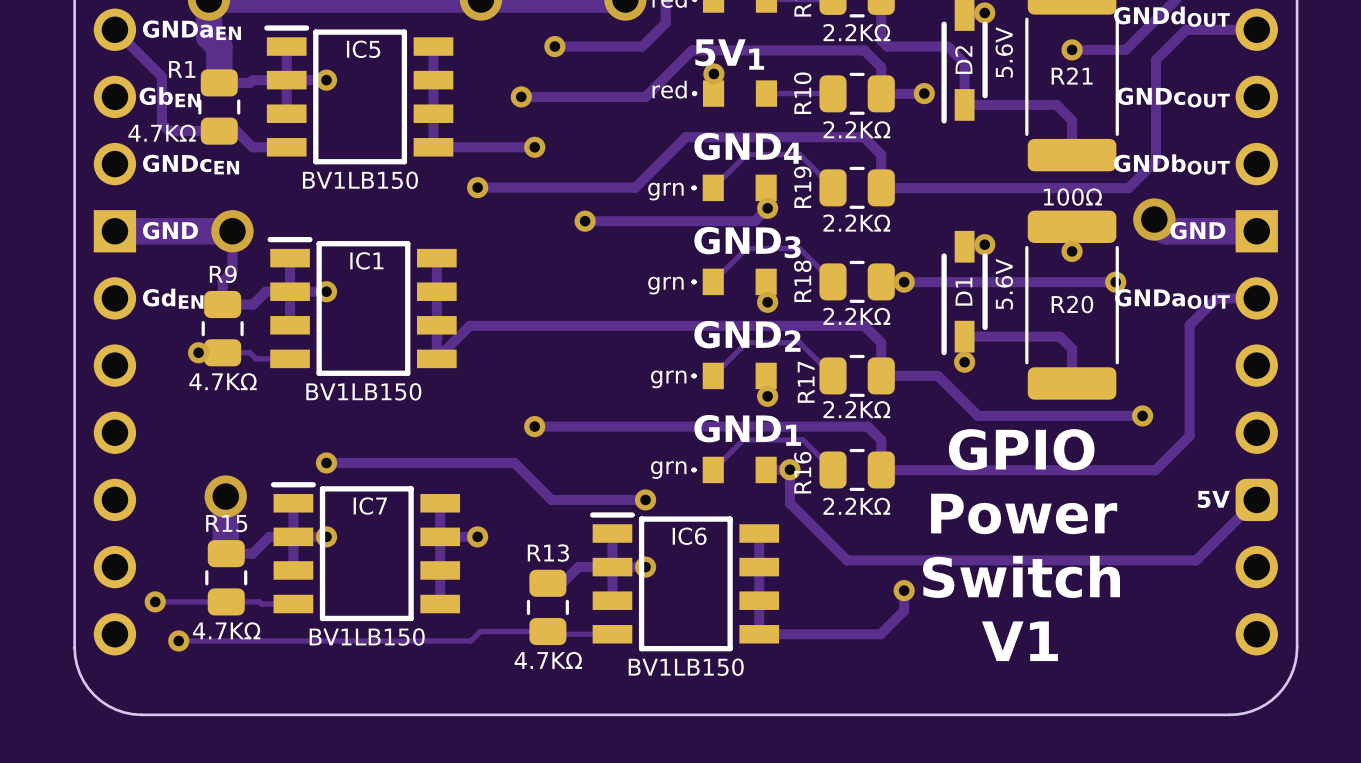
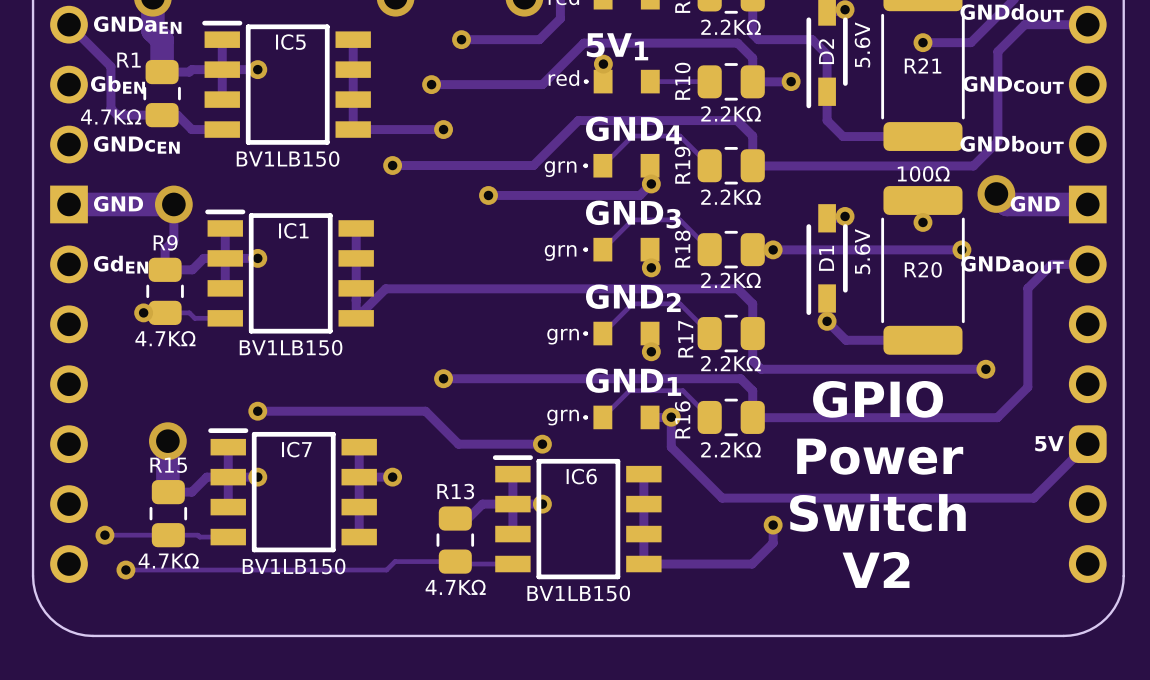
track: (964, 104) (1056, 104) (1072, 120) (1072, 155) -> (827, 91) (827, 120) (843, 136) (922, 136)
track: (964, 336) (1059, 336) (1072, 348) (1072, 383) -> (827, 321) (846, 340) (922, 340)
track: (881, 375) (938, 375) (978, 415) -> (752, 333) (752, 360) (761, 369) (839, 369)
text: V1 (1019, 641) -> V2 (876, 569)

